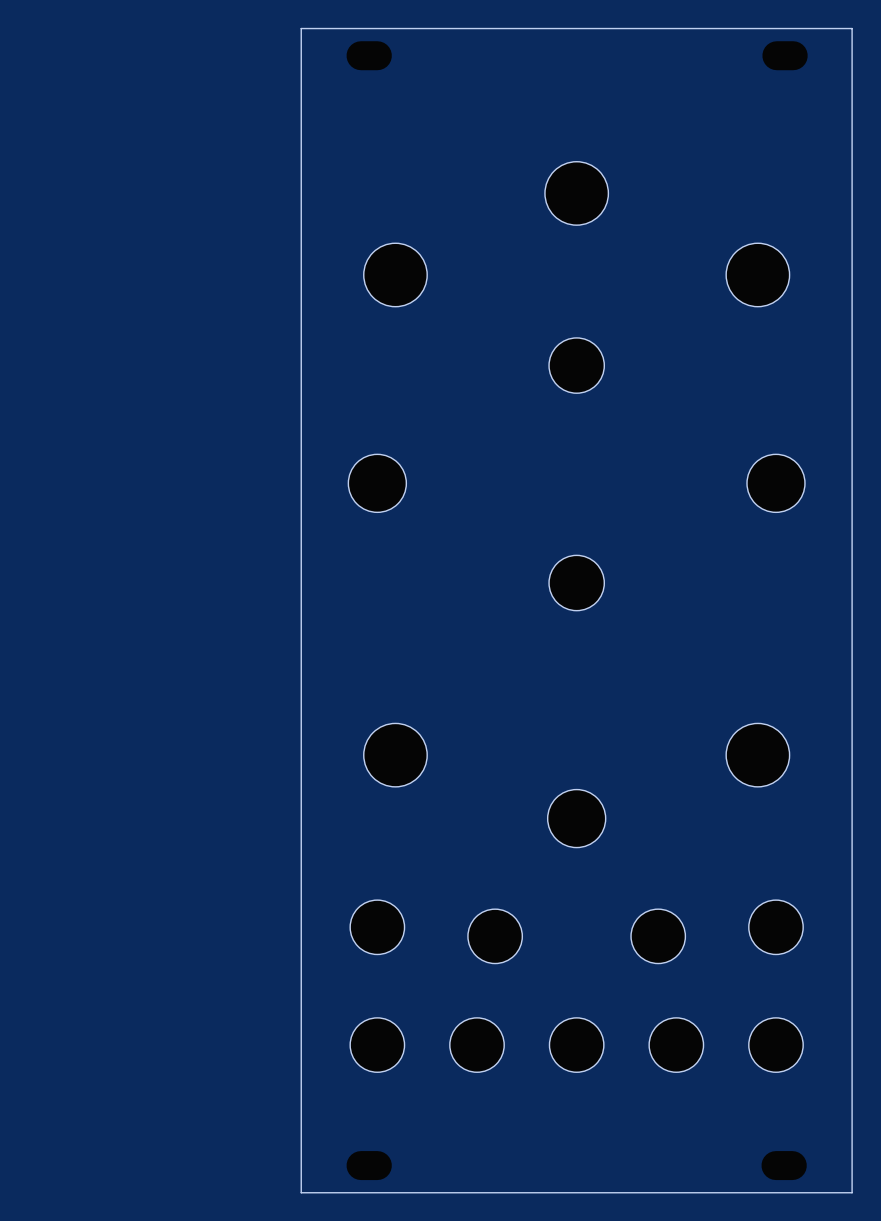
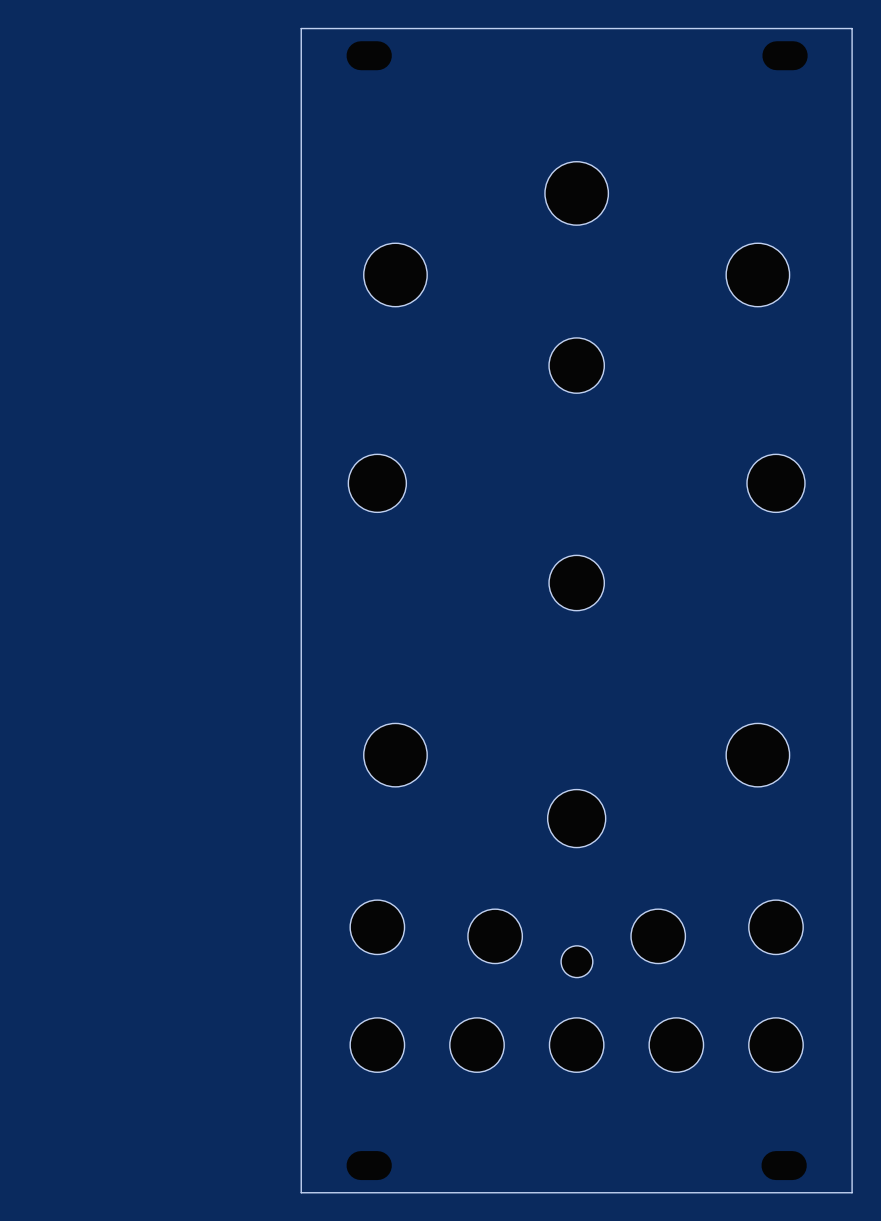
part: none -> (576, 961)

